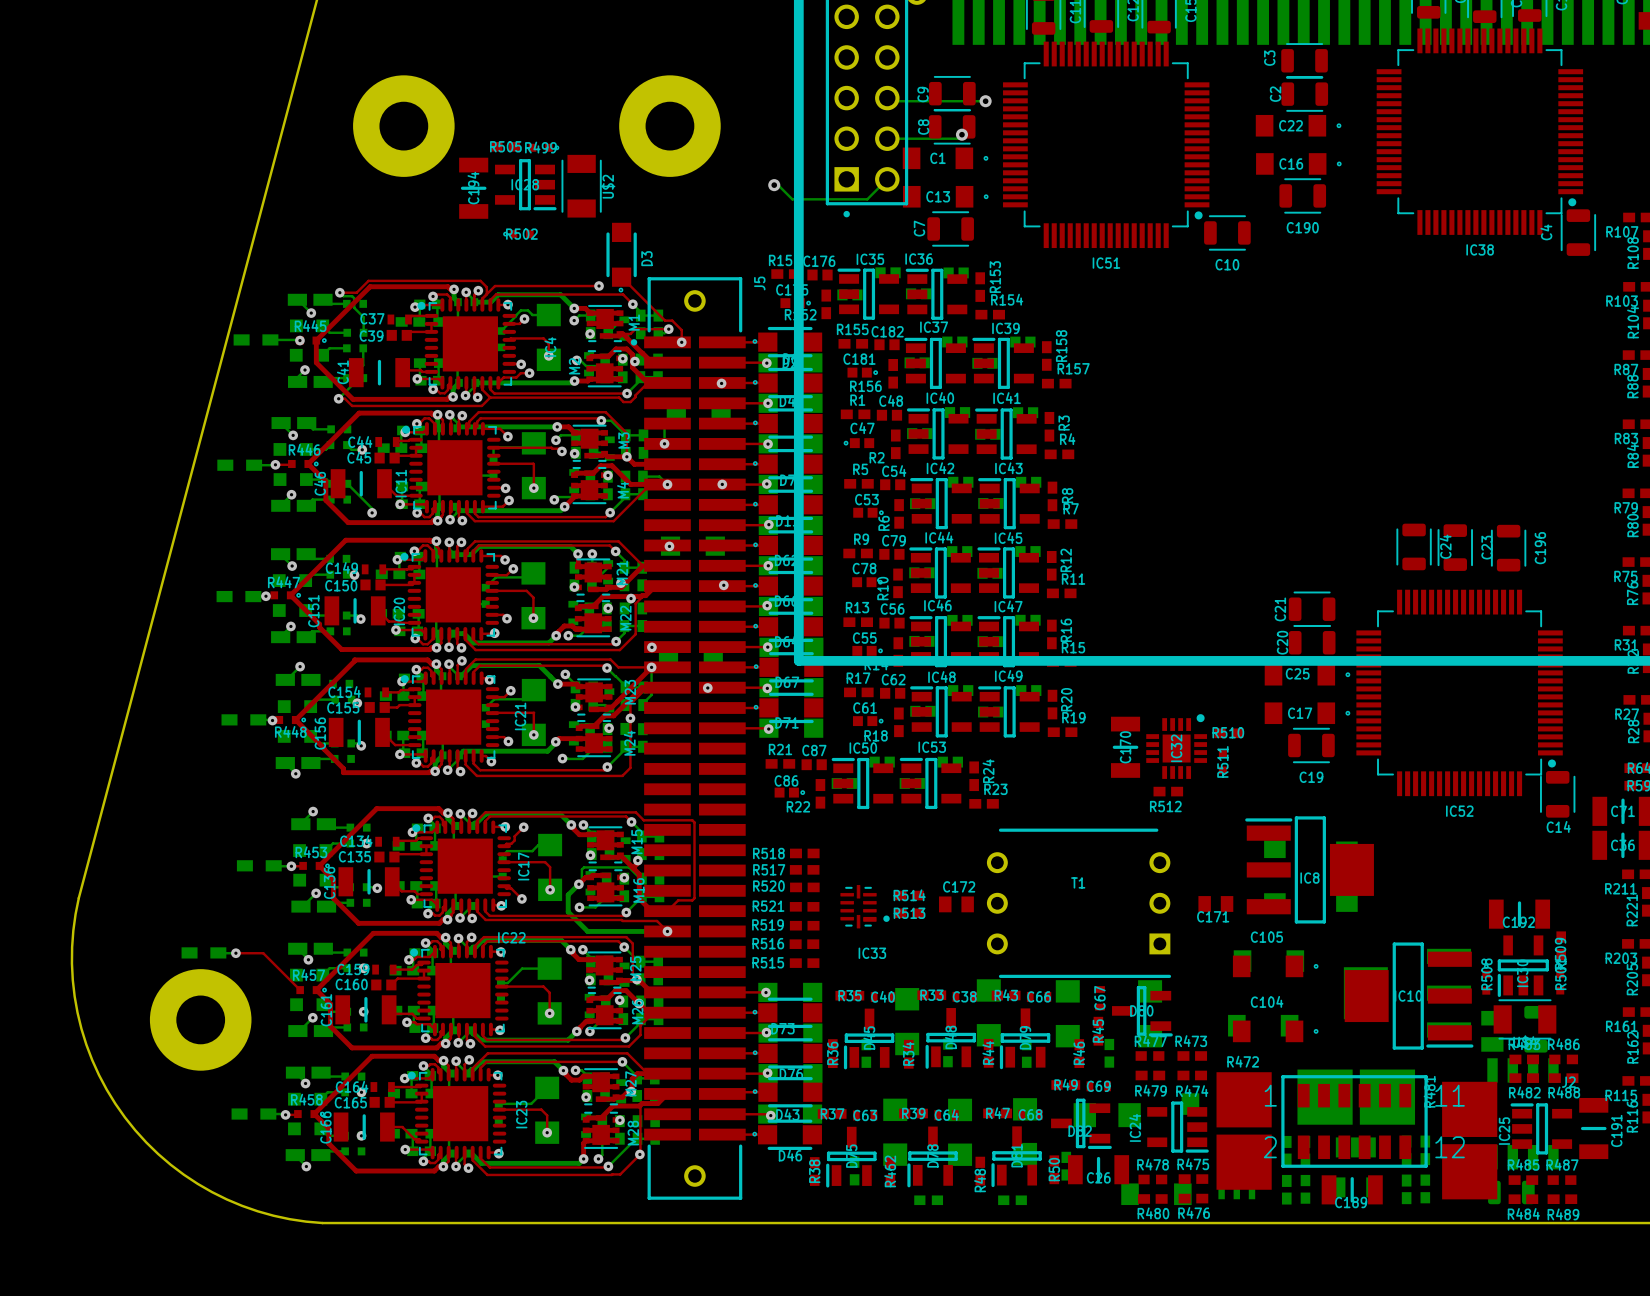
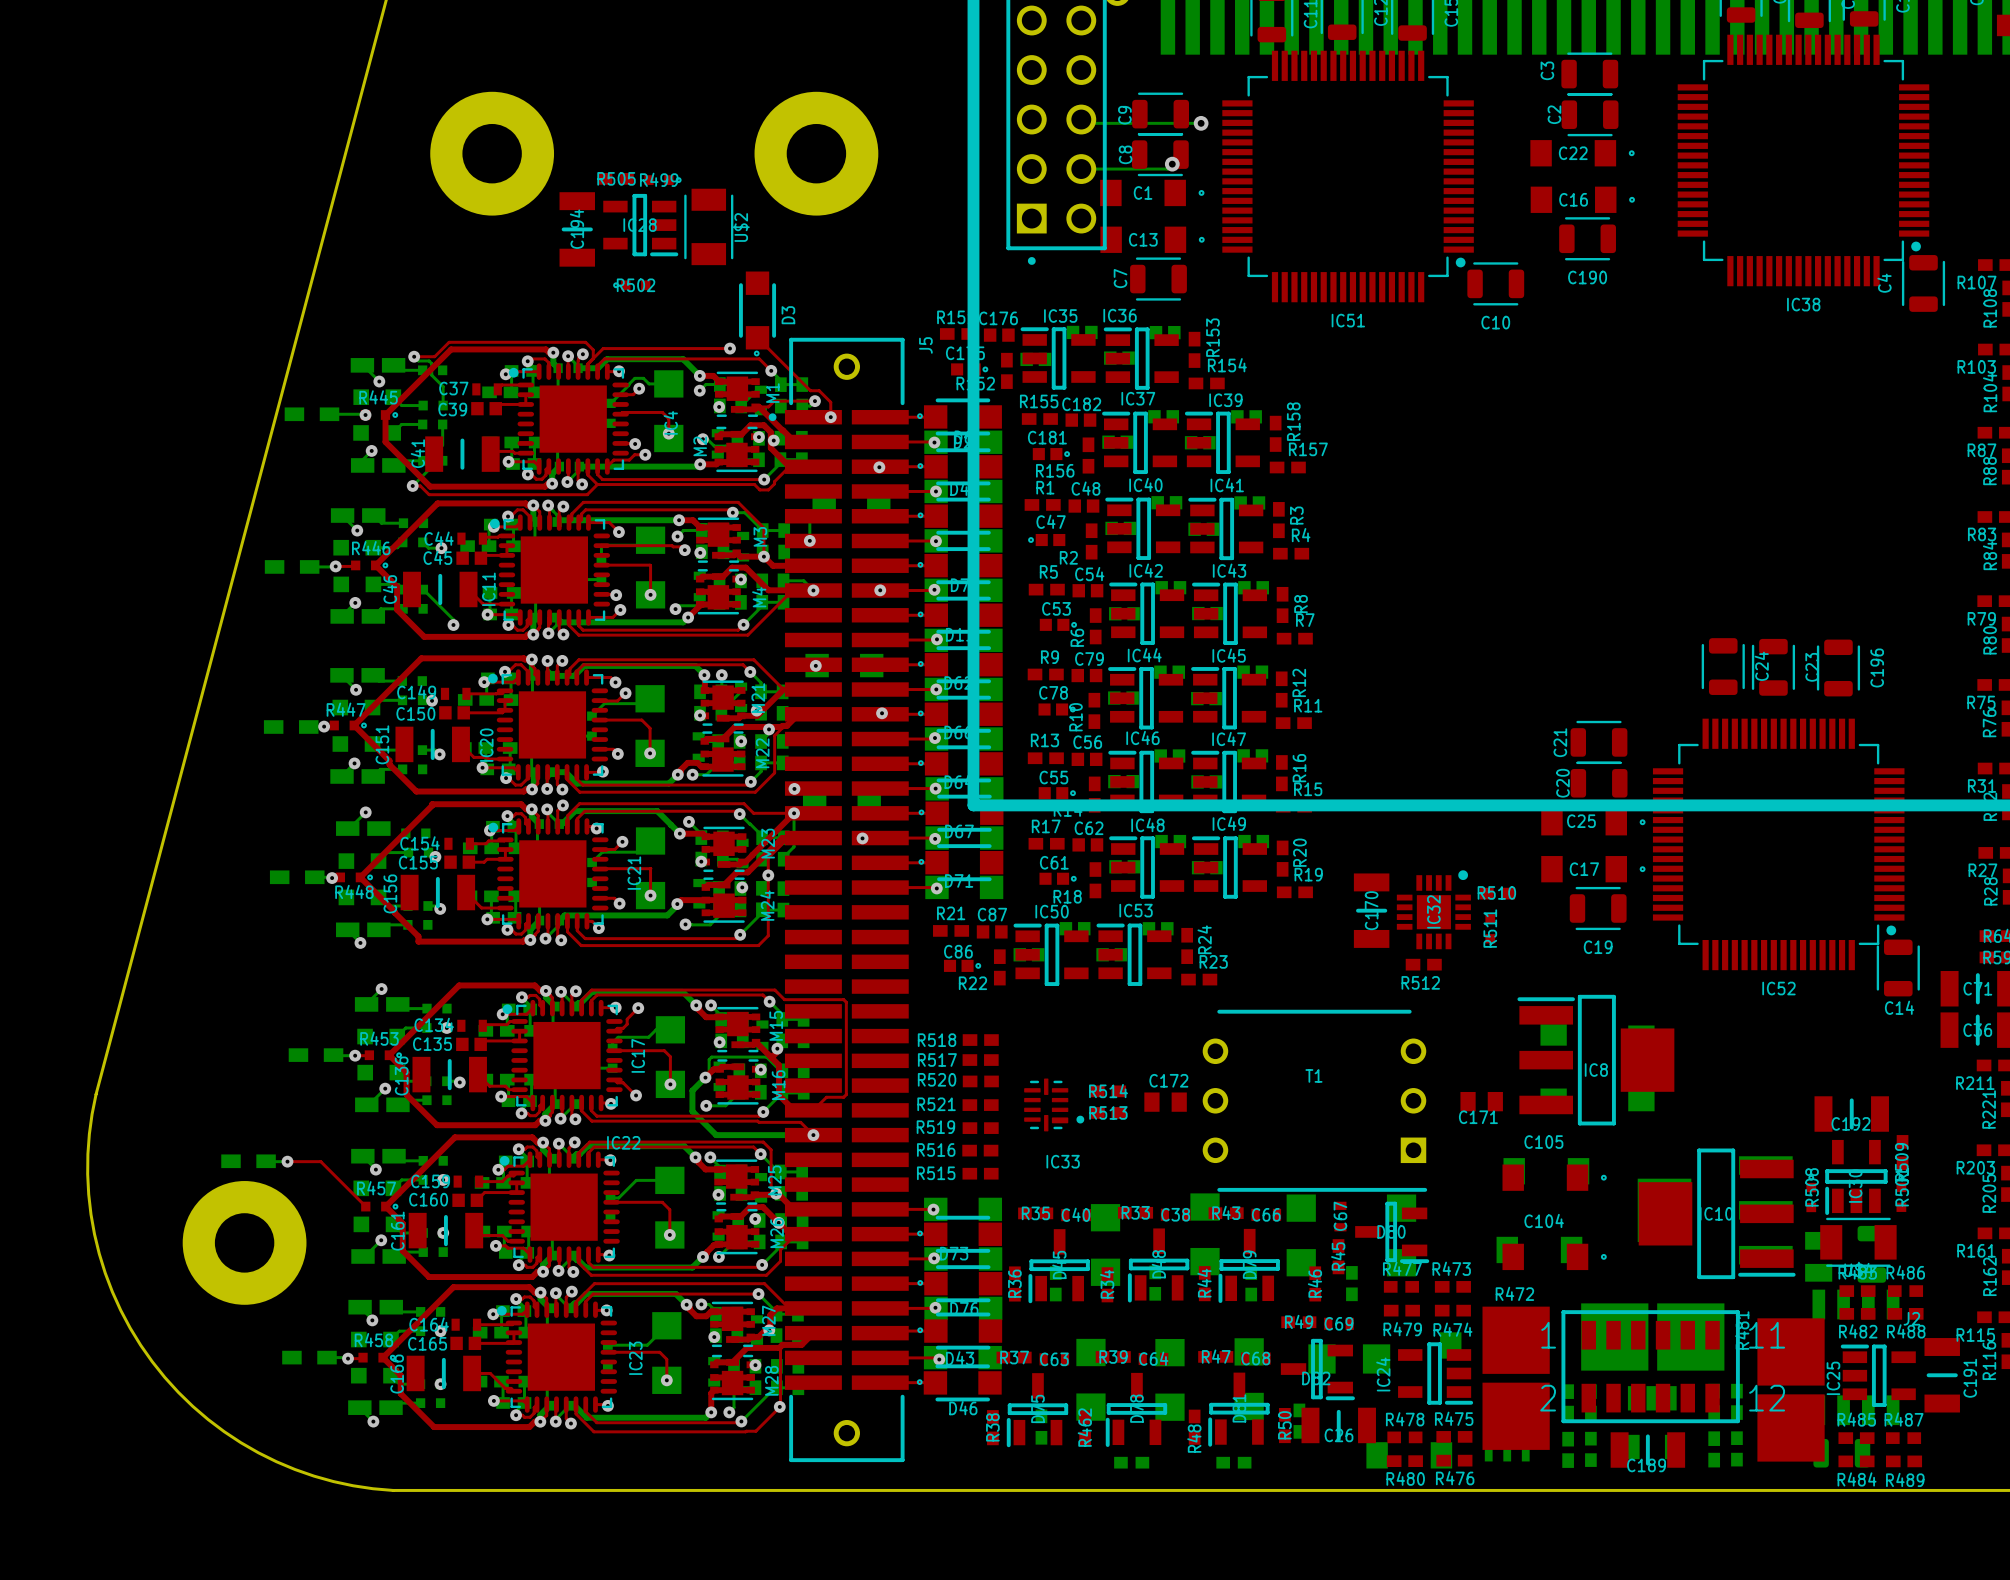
bottom track: (887, 179) (867, 199) (792, 199) (778, 185) (774, 185) -> none
via: (774, 185) -> none

